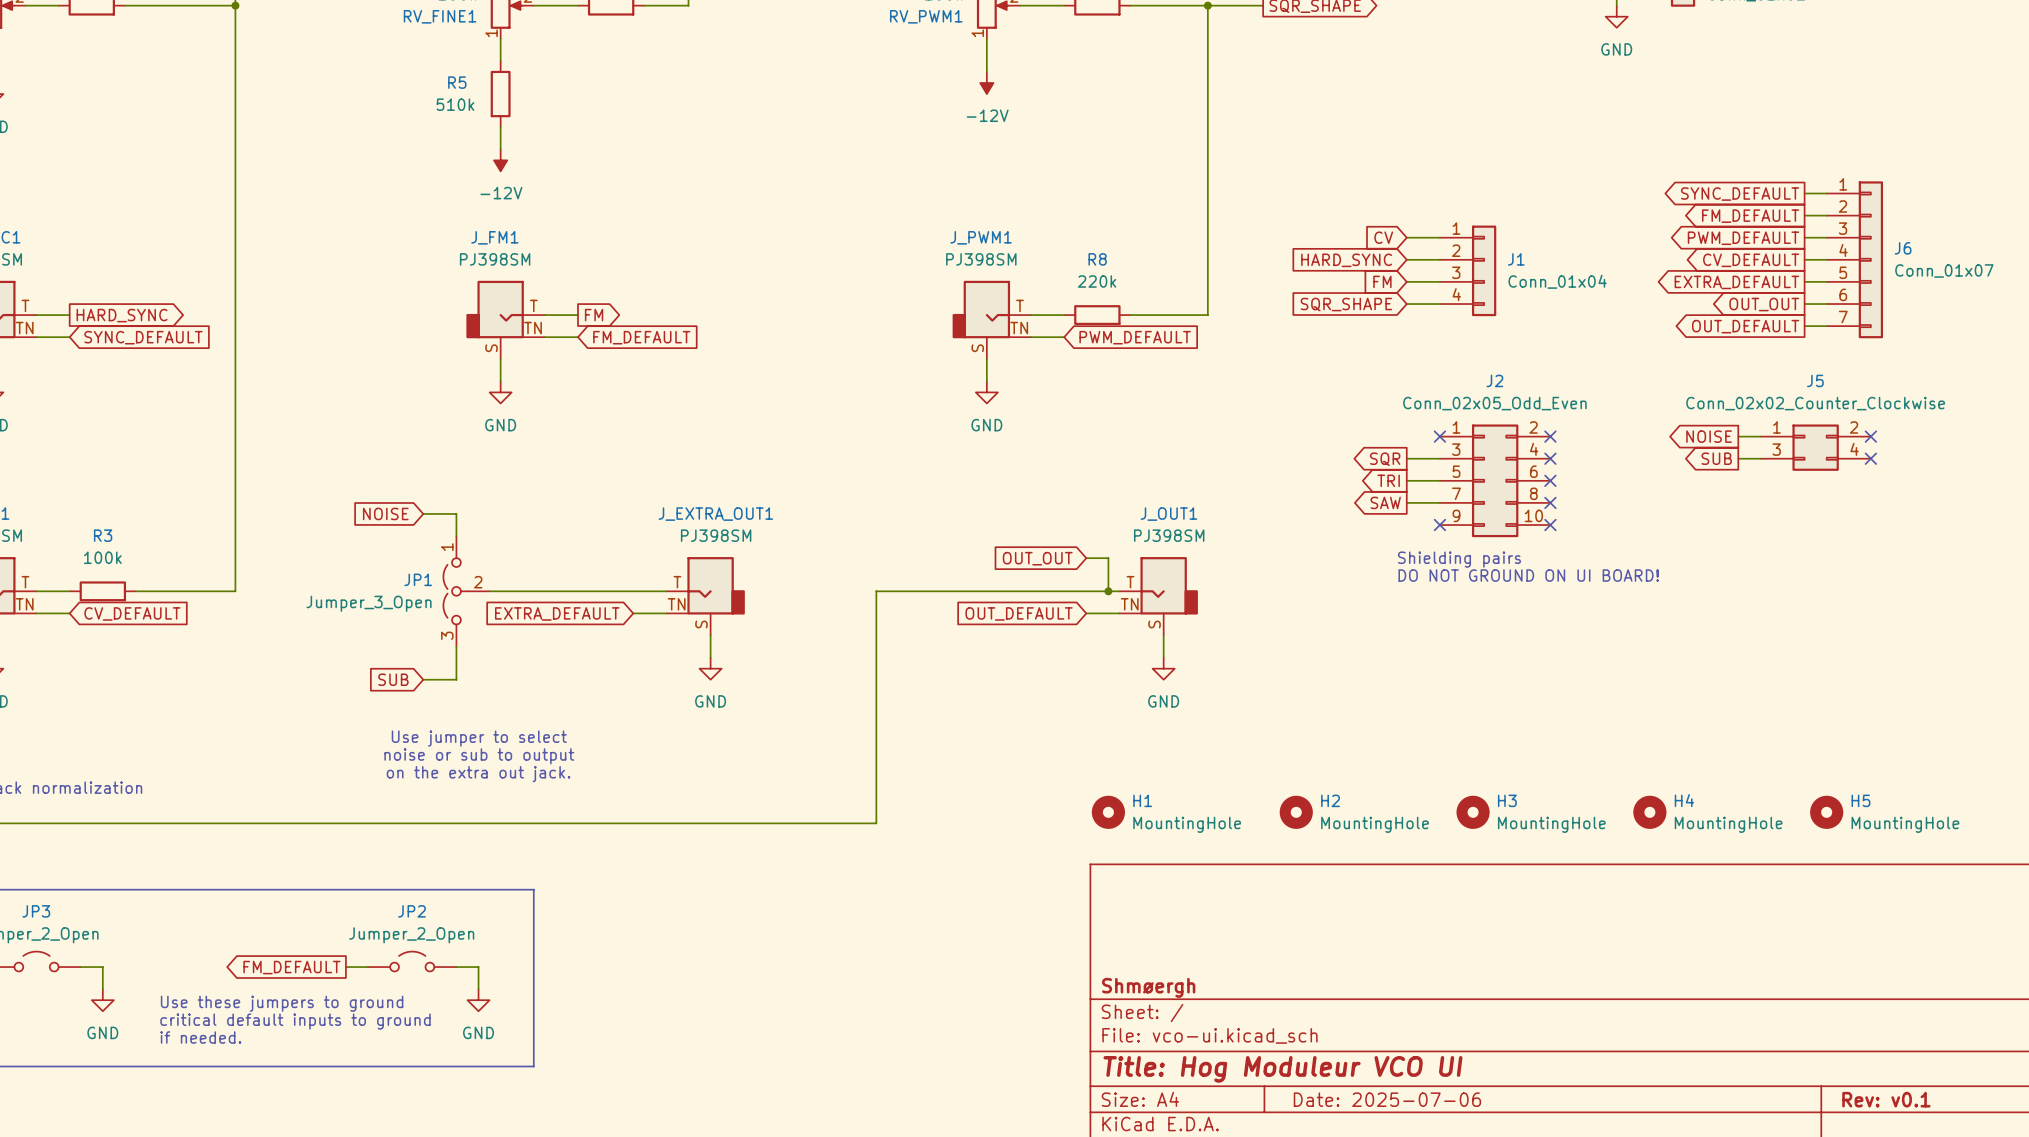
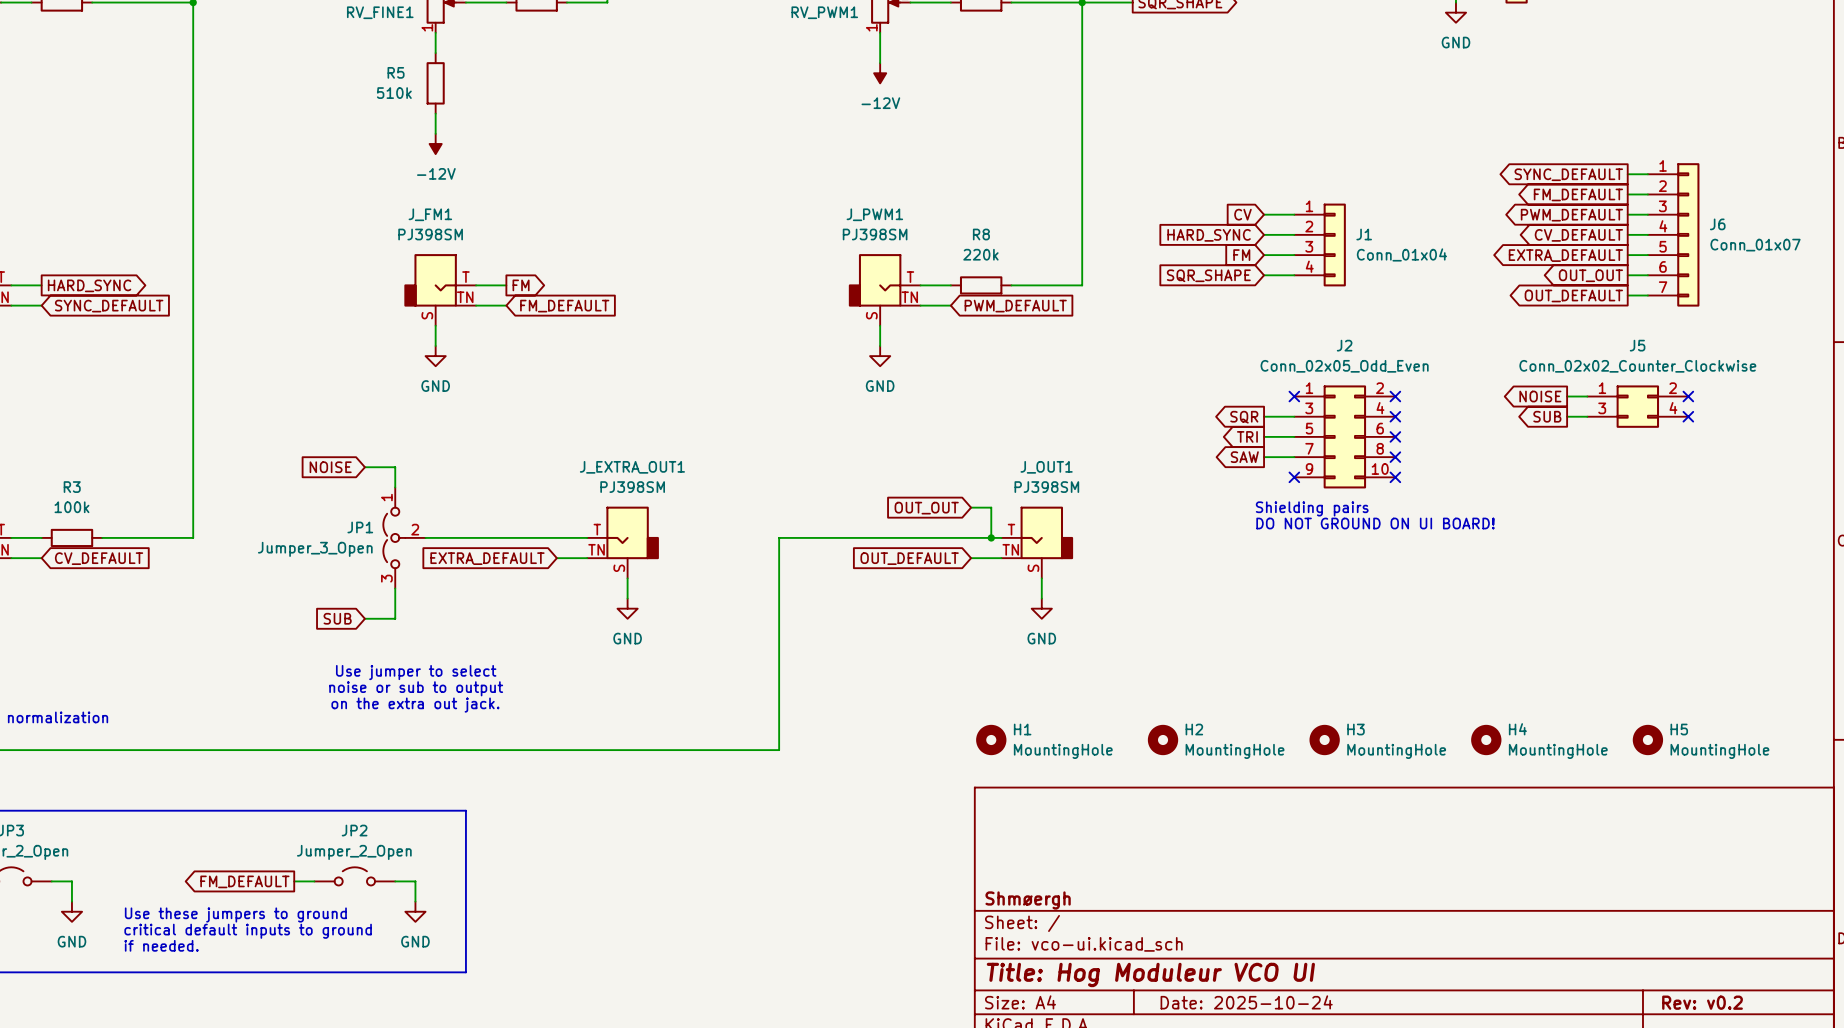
title block: Date: 2025-07-06 (1387, 1099) -> Date: 2025-10-24 (1246, 1002)
title block: Rev: v0.1 (1886, 1099) -> Rev: v0.2 (1702, 1002)

